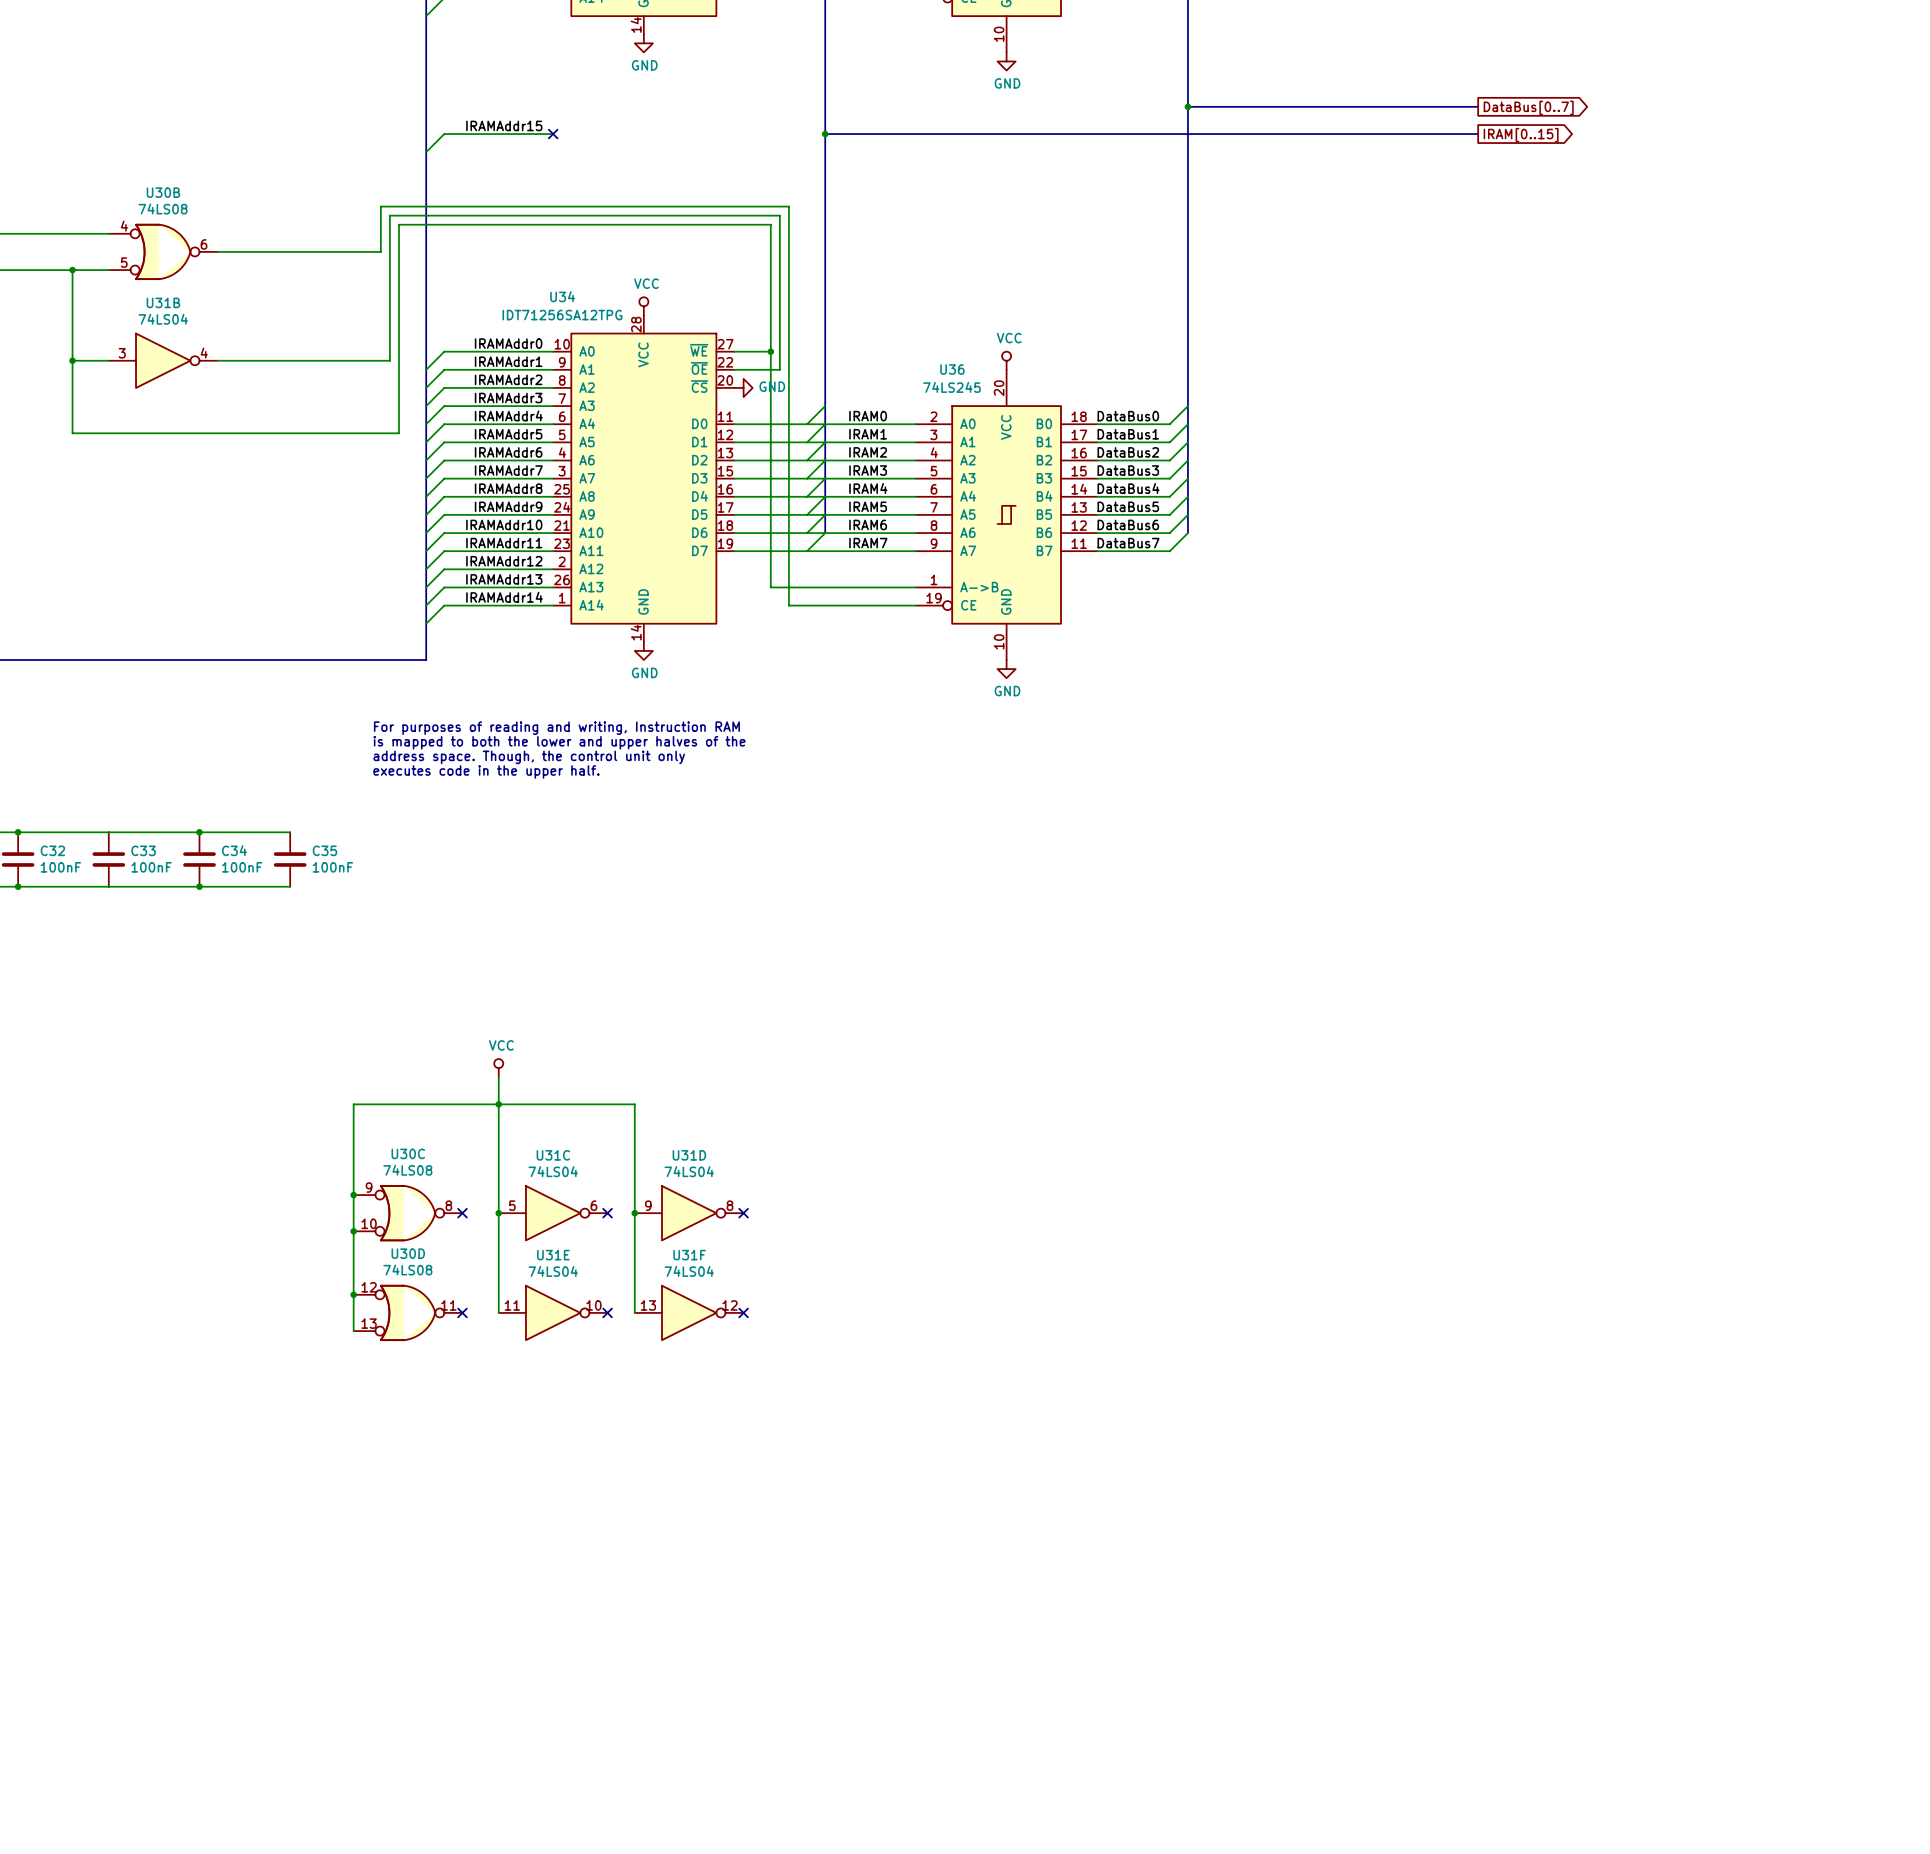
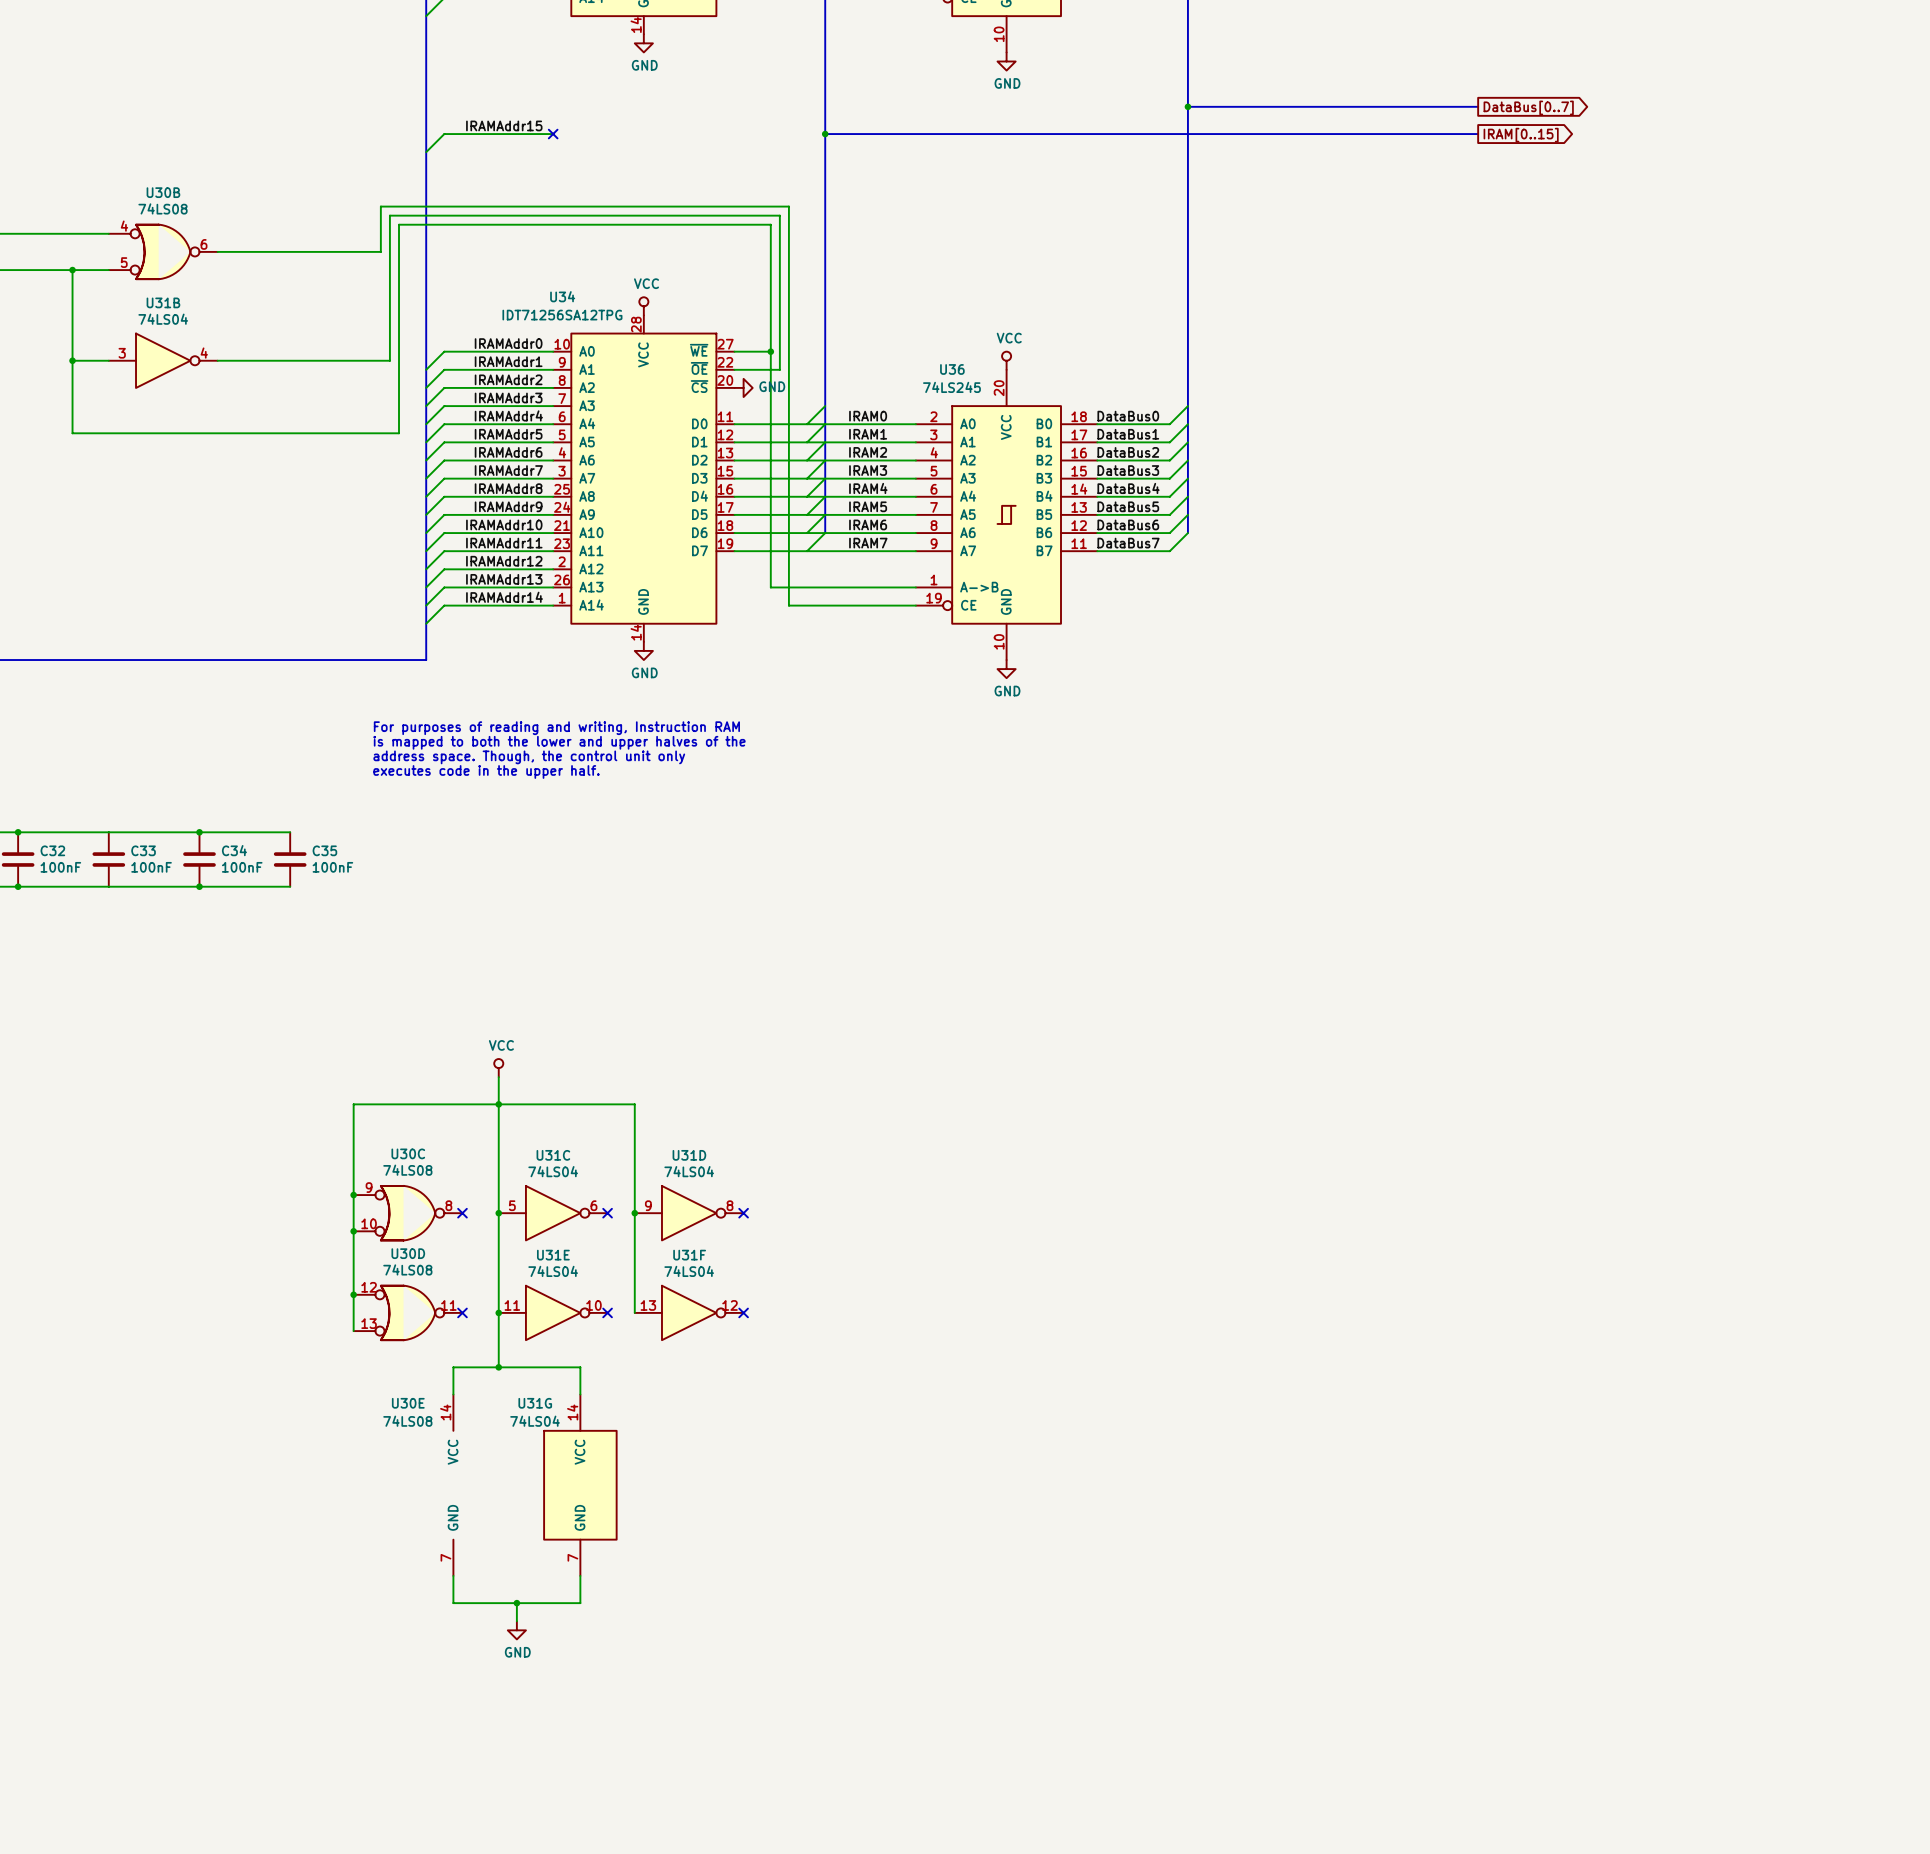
wire: none -> (498, 1312) (498, 1367)
junction: none -> (498, 1312)
junction: none -> (498, 1367)
wire: none -> (453, 1394) (453, 1367) (580, 1367) (580, 1394)
U30E: none -> 74LS08 (453, 1485)
U31G: none -> 74LS04 (580, 1485)
wire: none -> (453, 1575) (453, 1603) (580, 1603) (580, 1575)
wire: none -> (516, 1603) (516, 1621)
junction: none -> (516, 1603)
power symbol: none -> GND (516, 1630)

